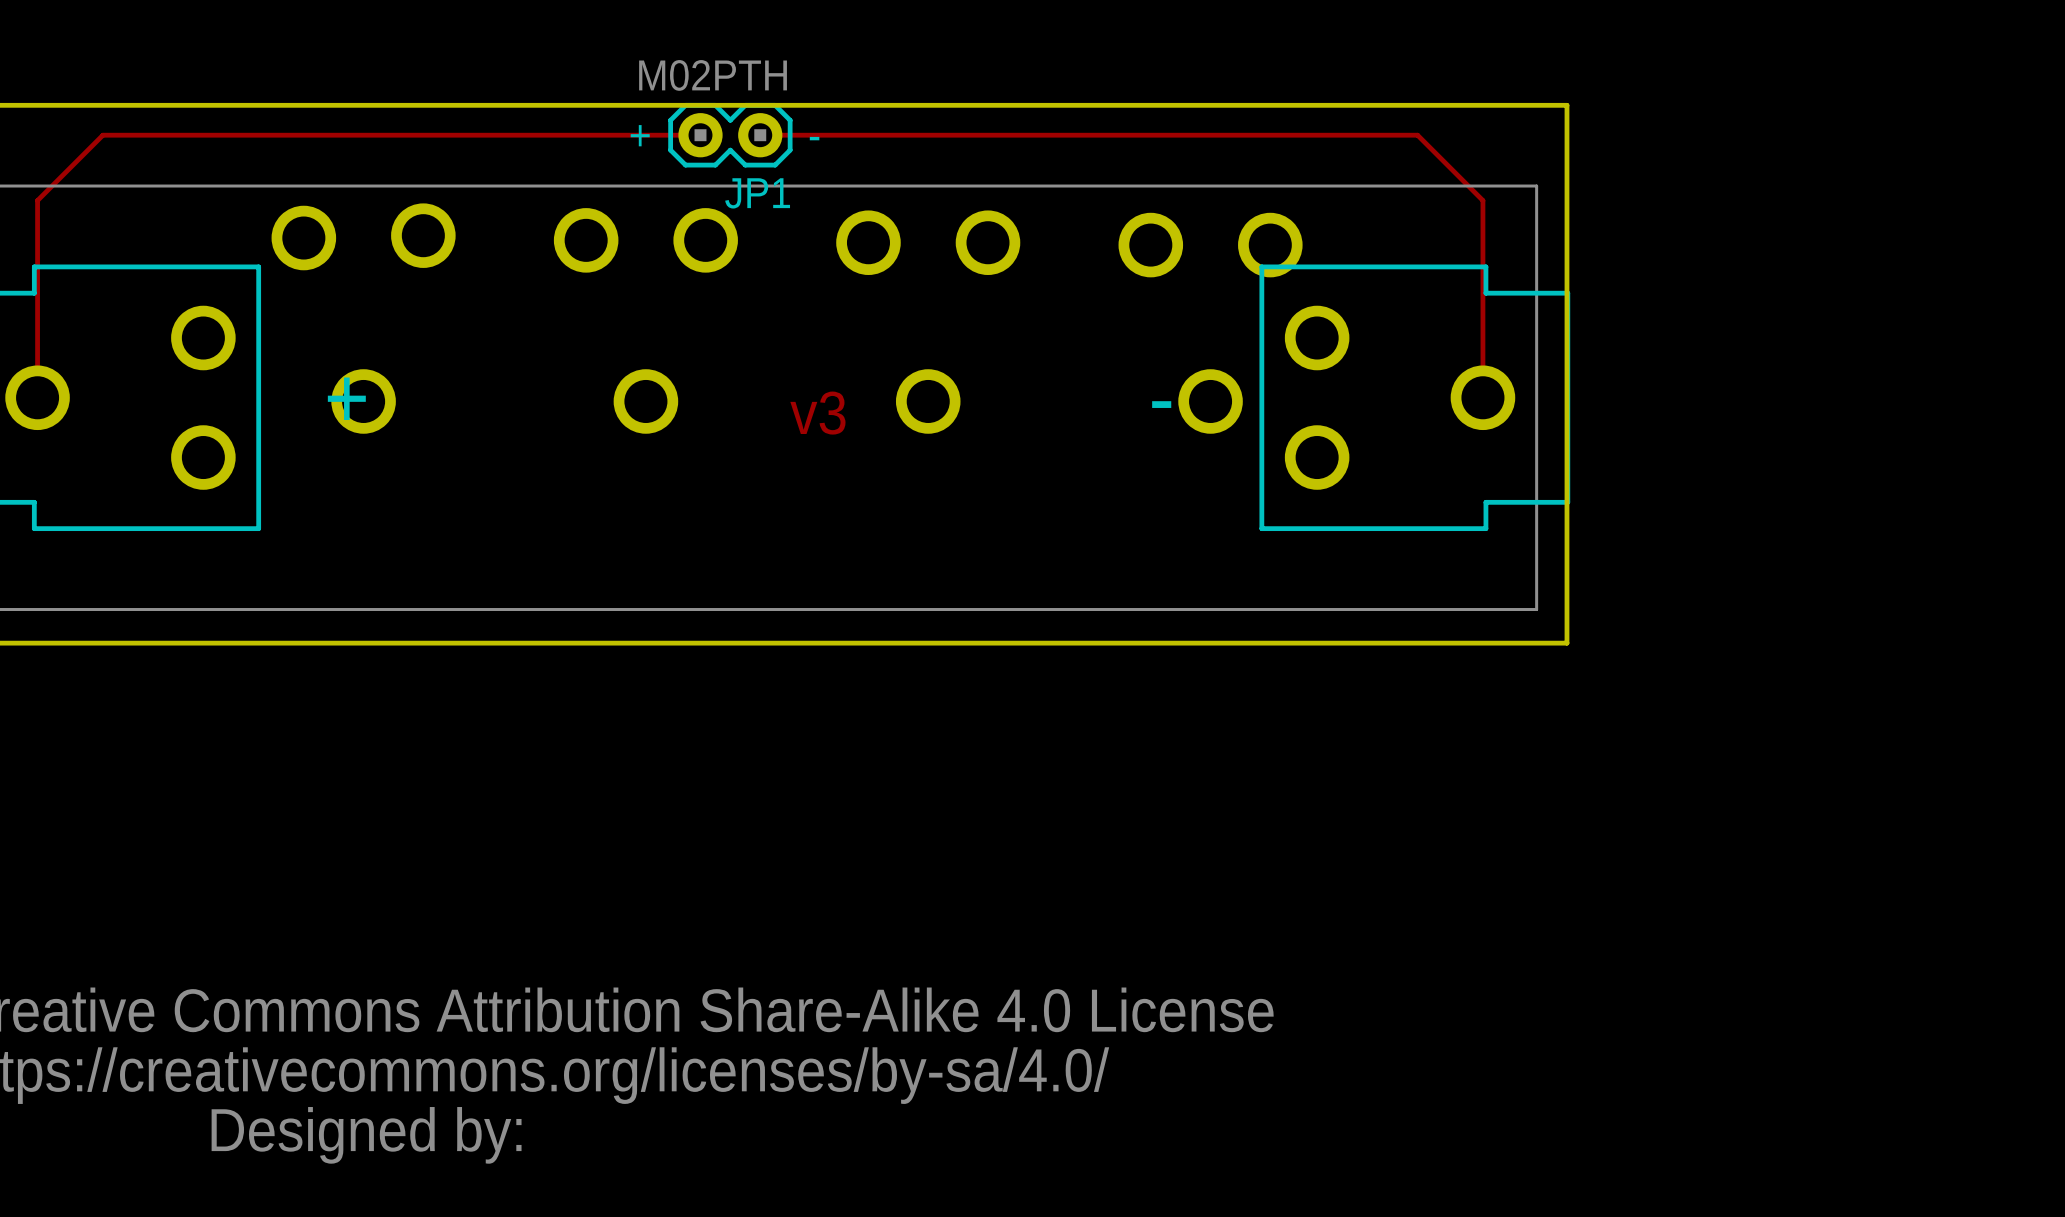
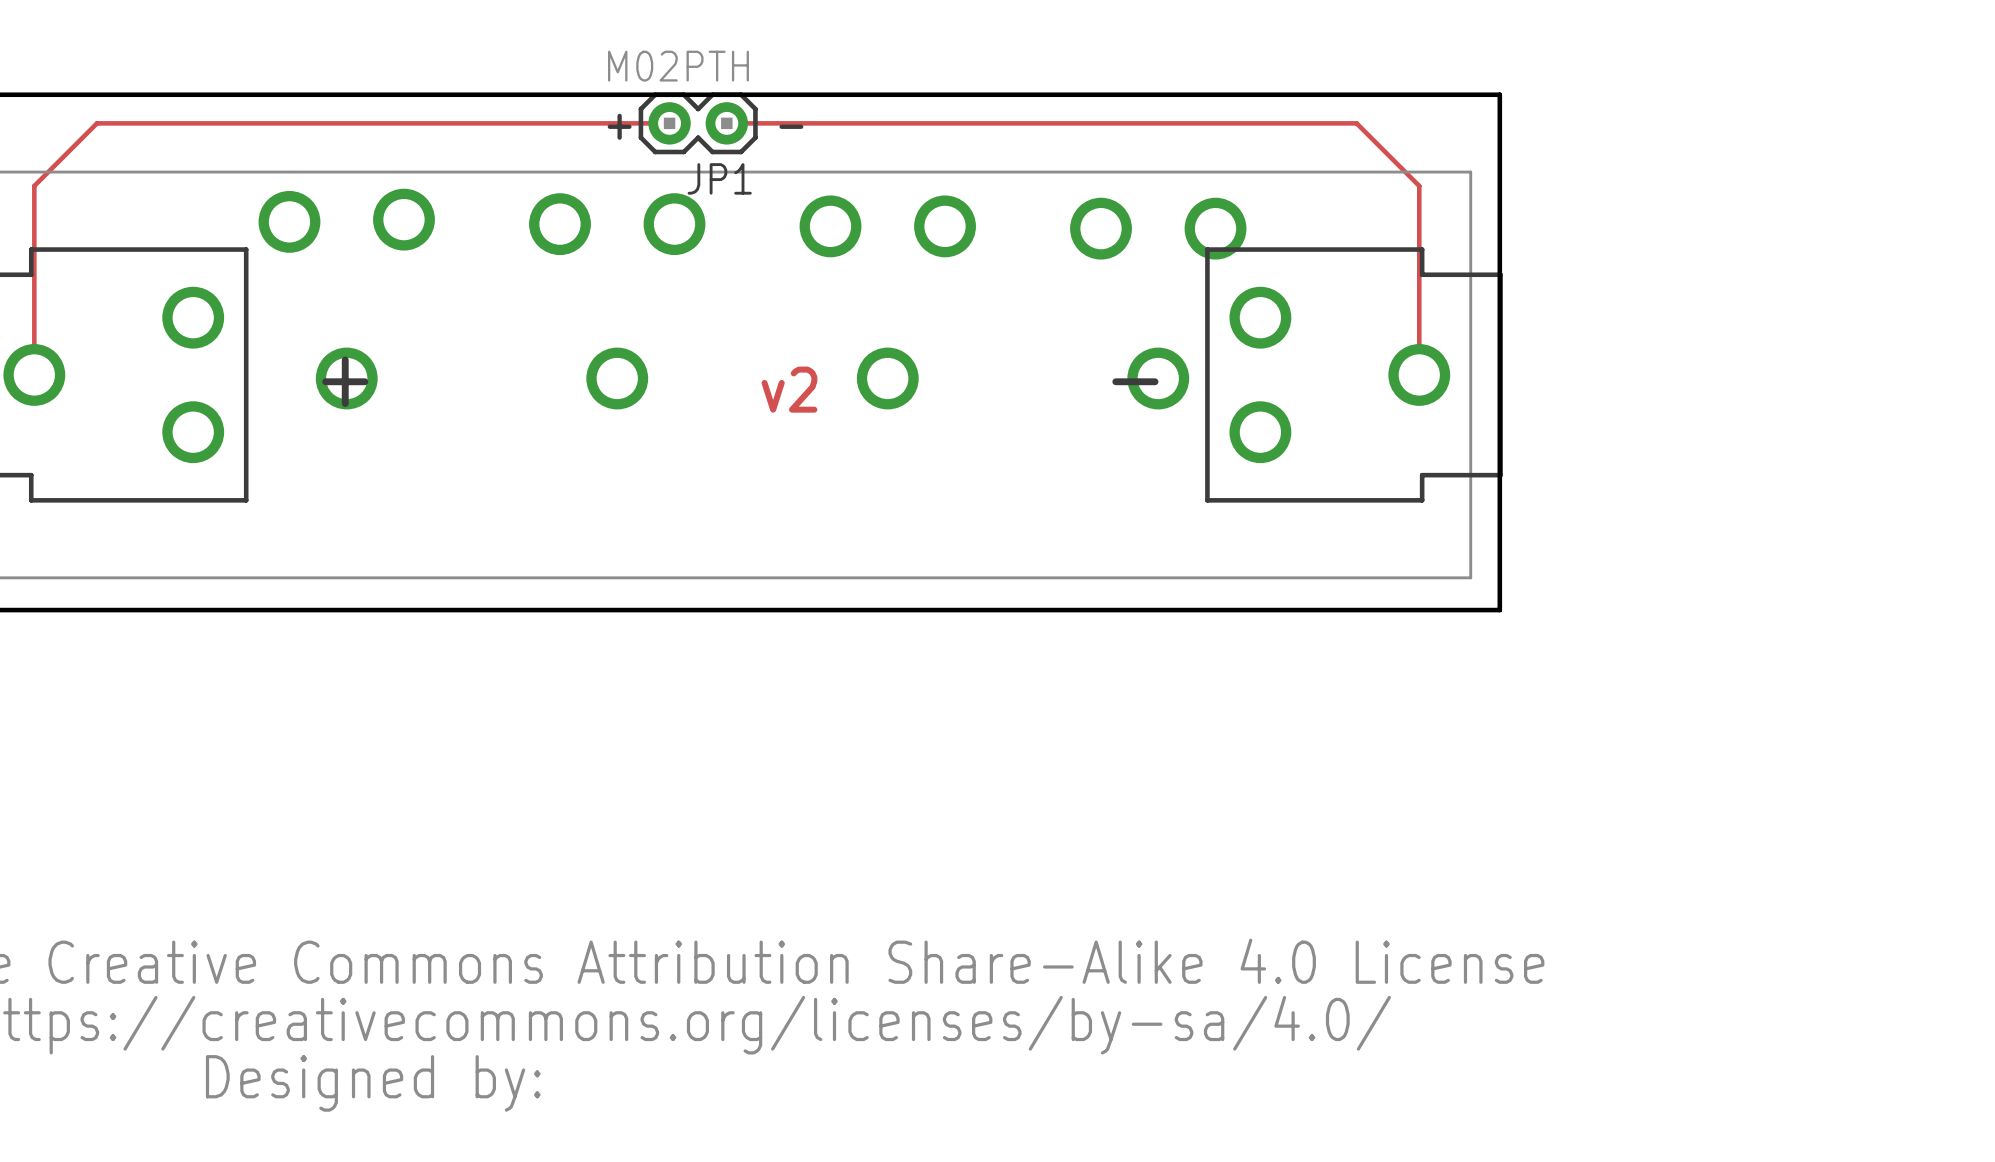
text: v3 (817, 413) -> v2 (789, 389)

